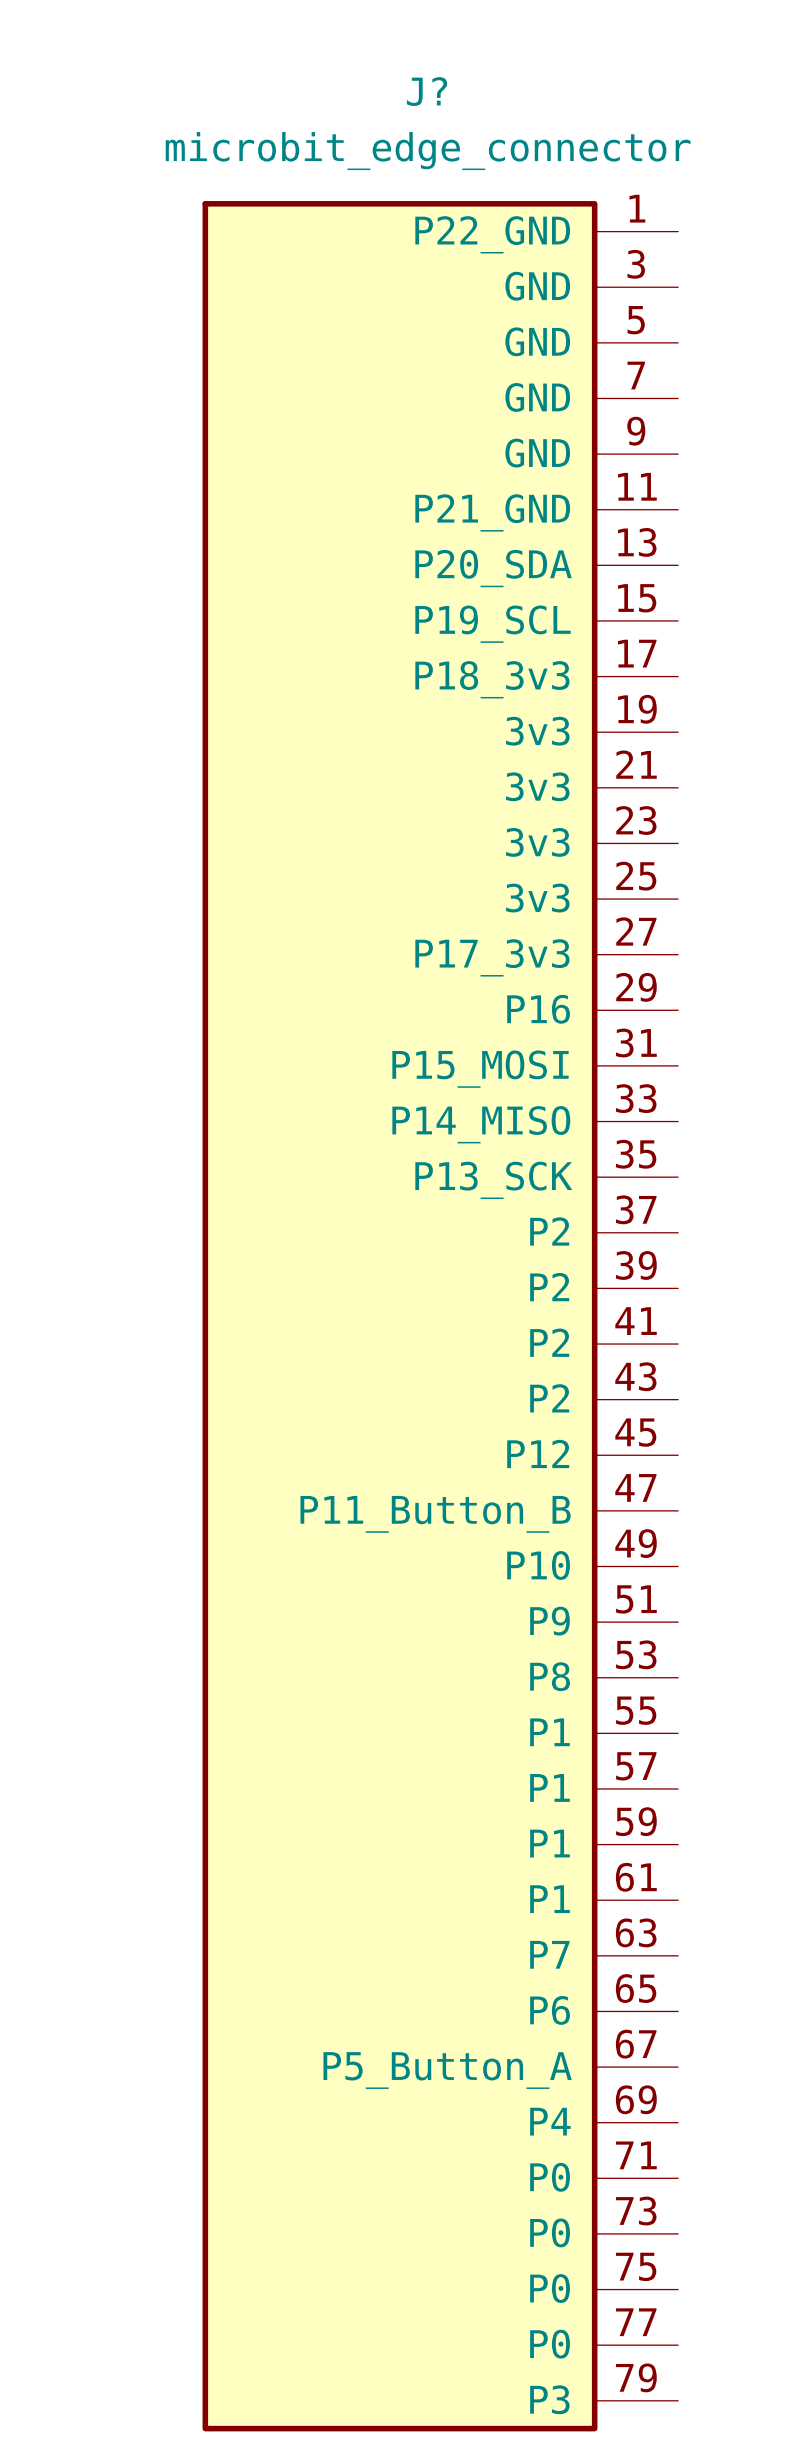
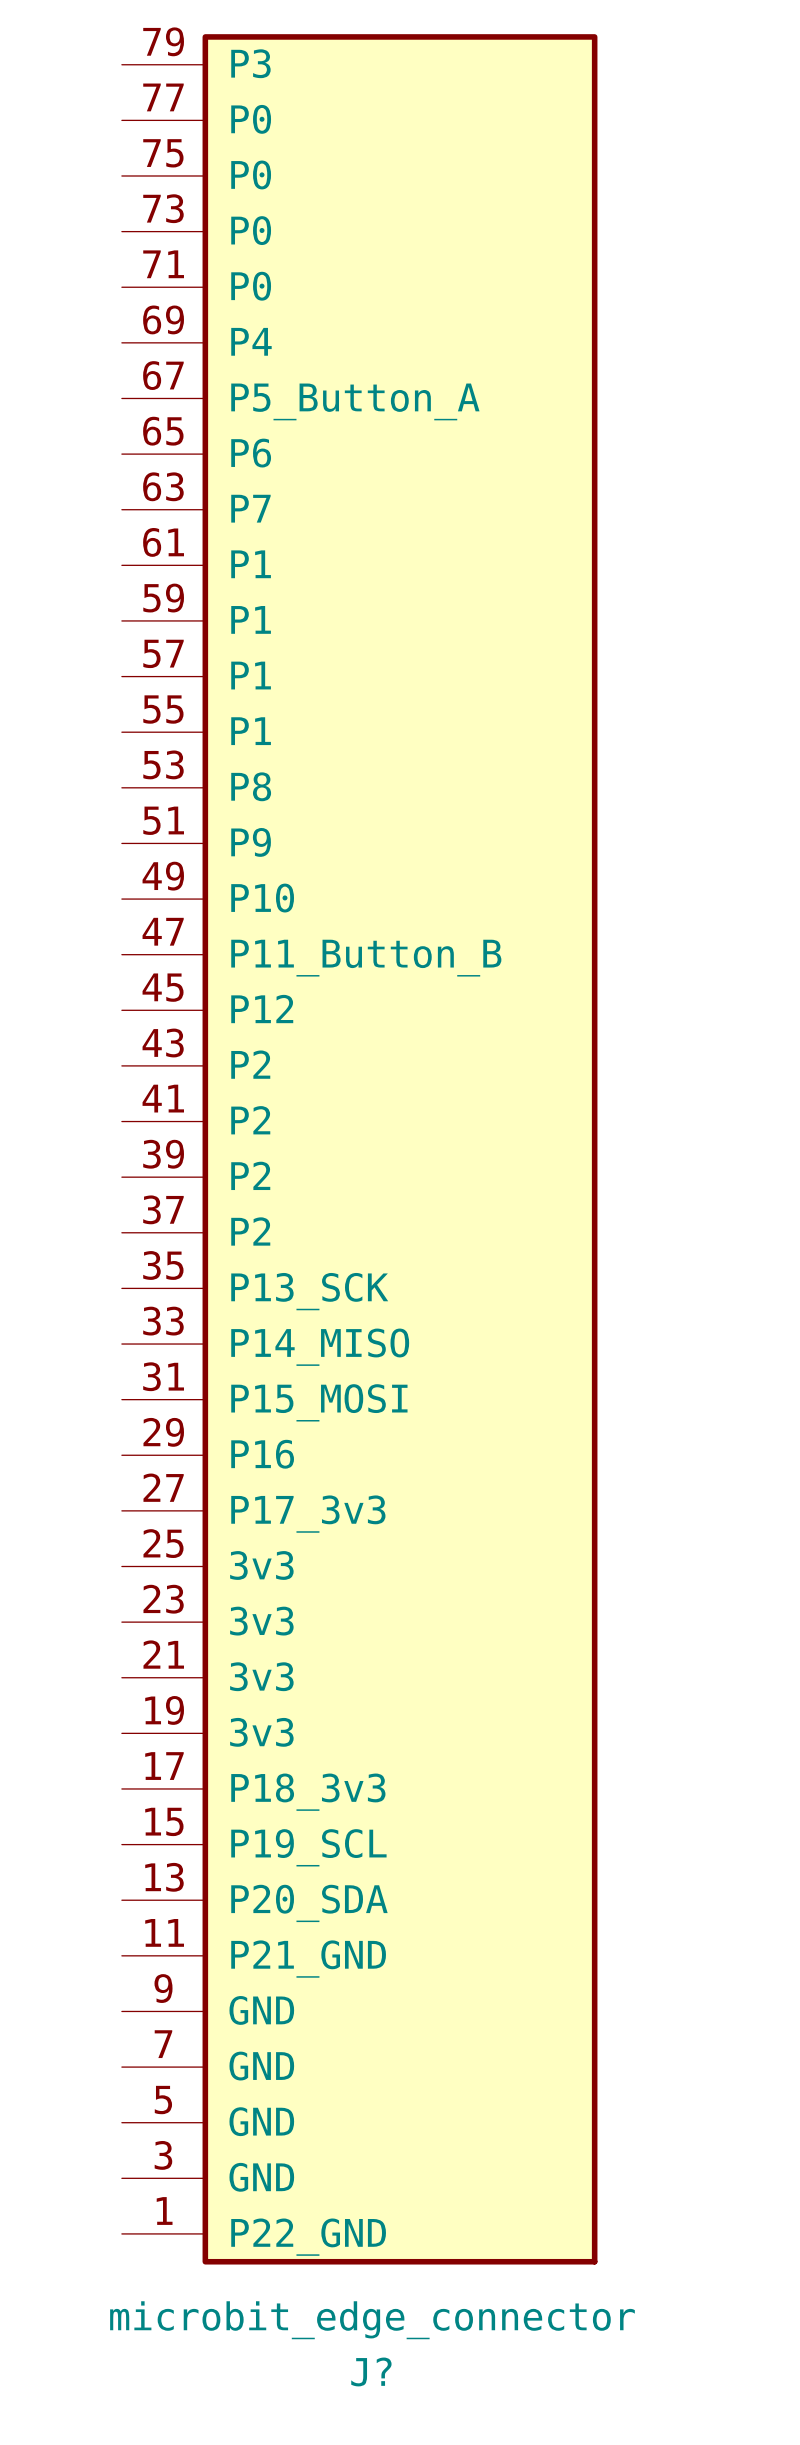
J? rotation: 0° (400, 1316) -> 180° (400, 1149)

